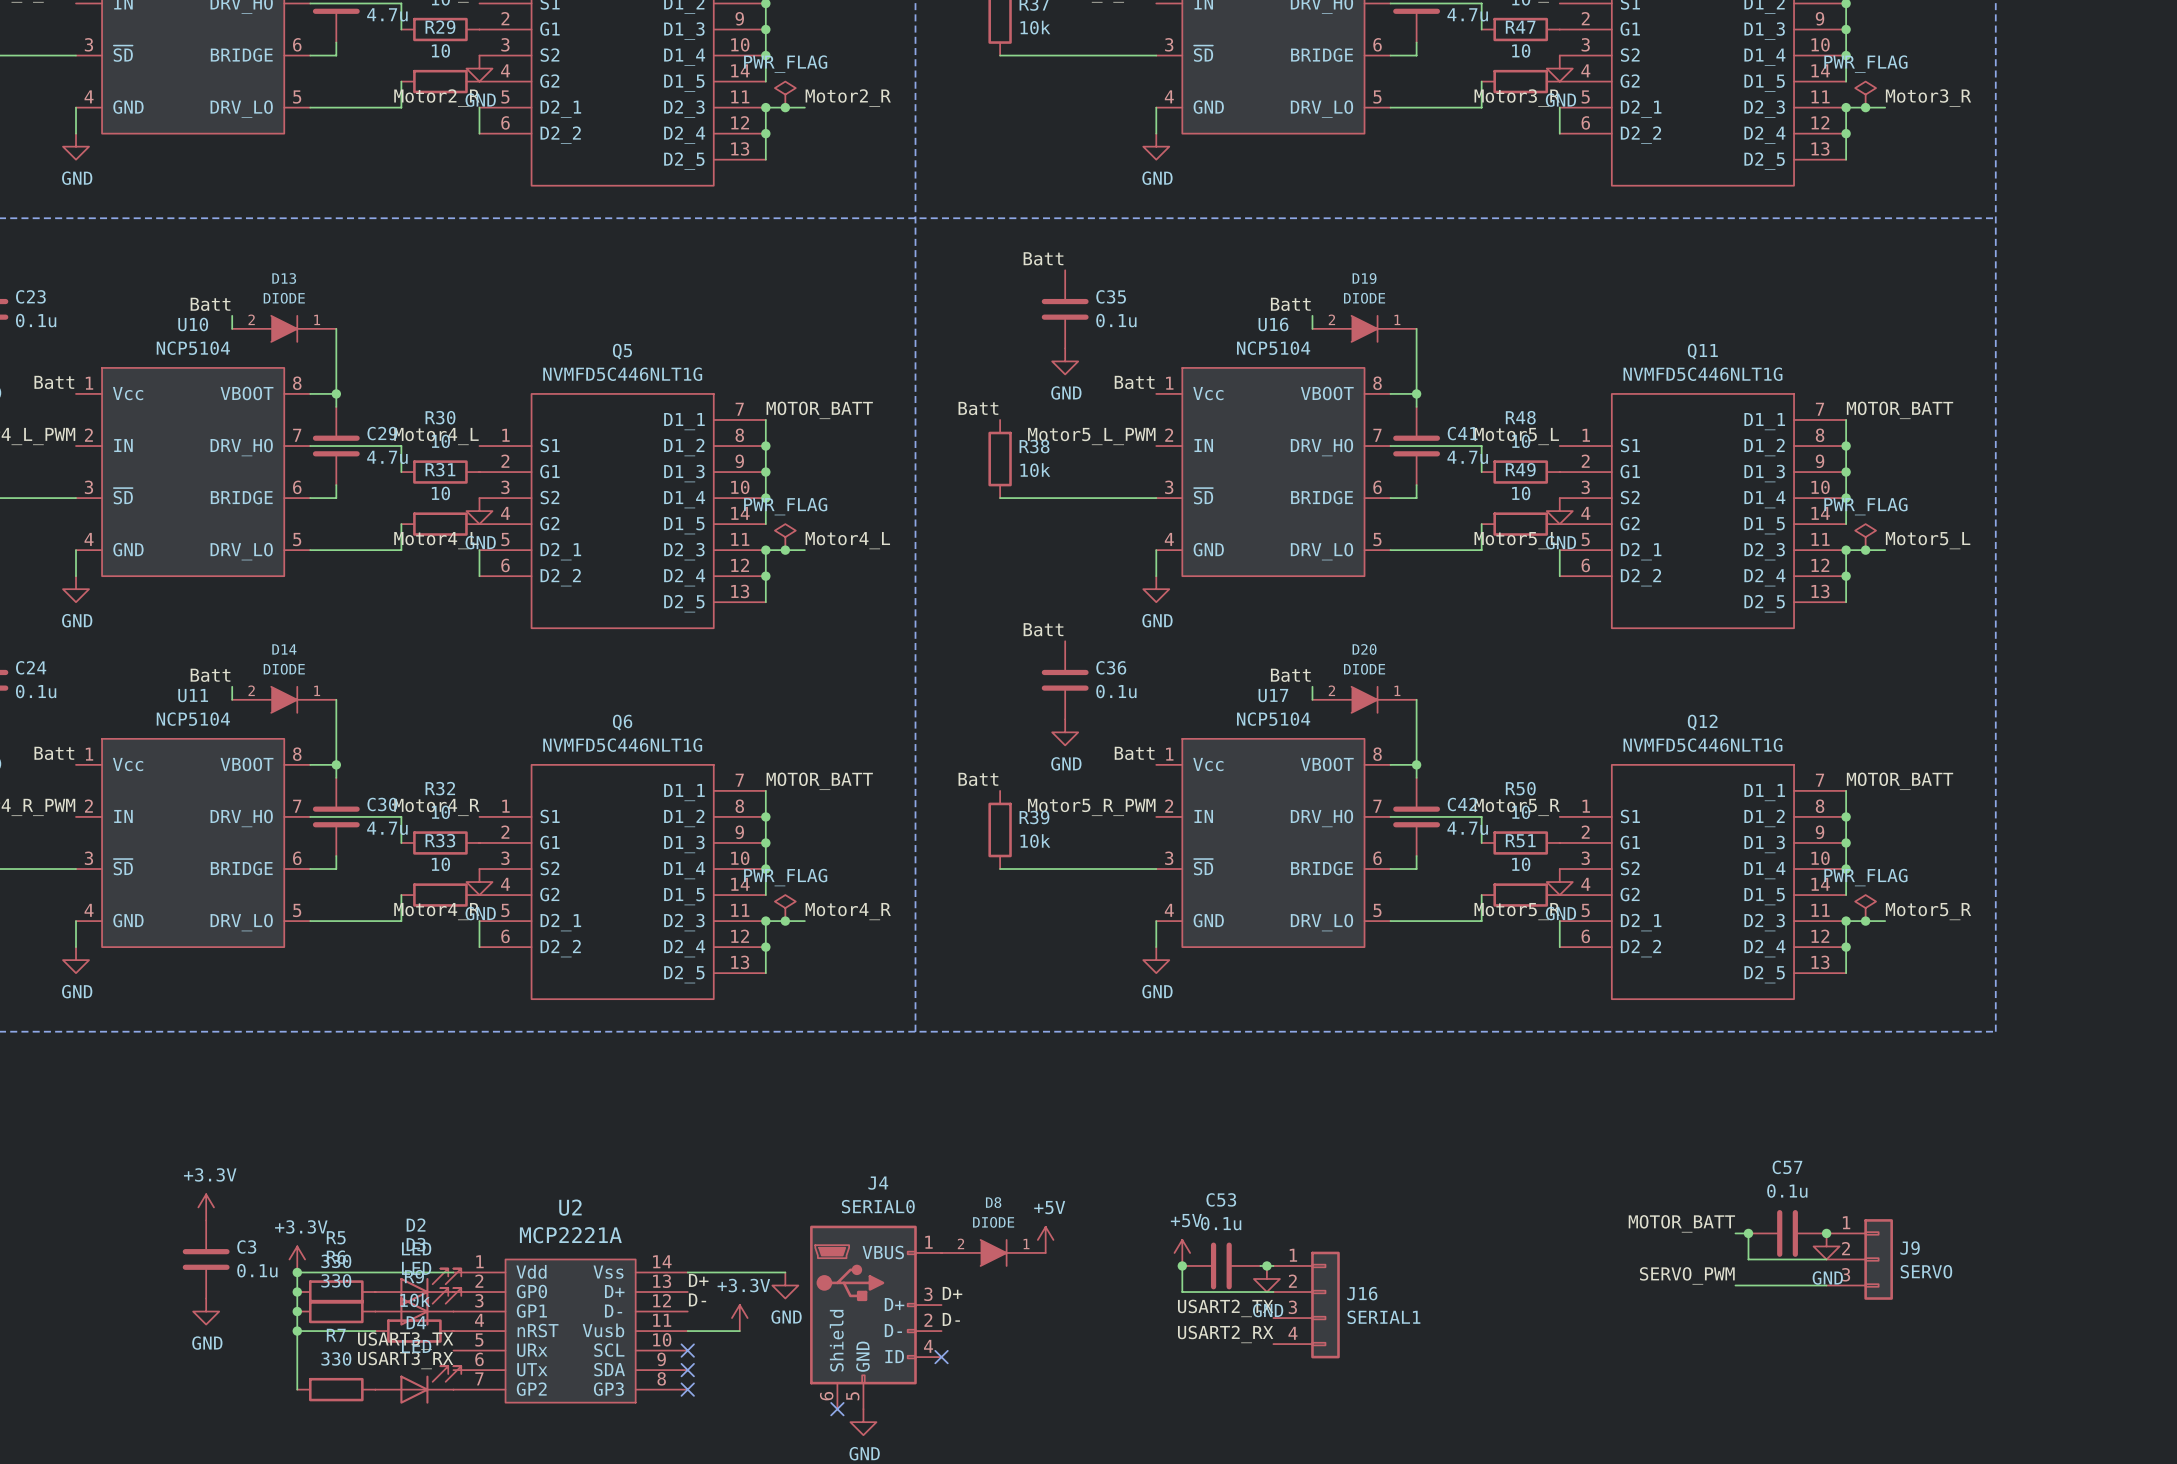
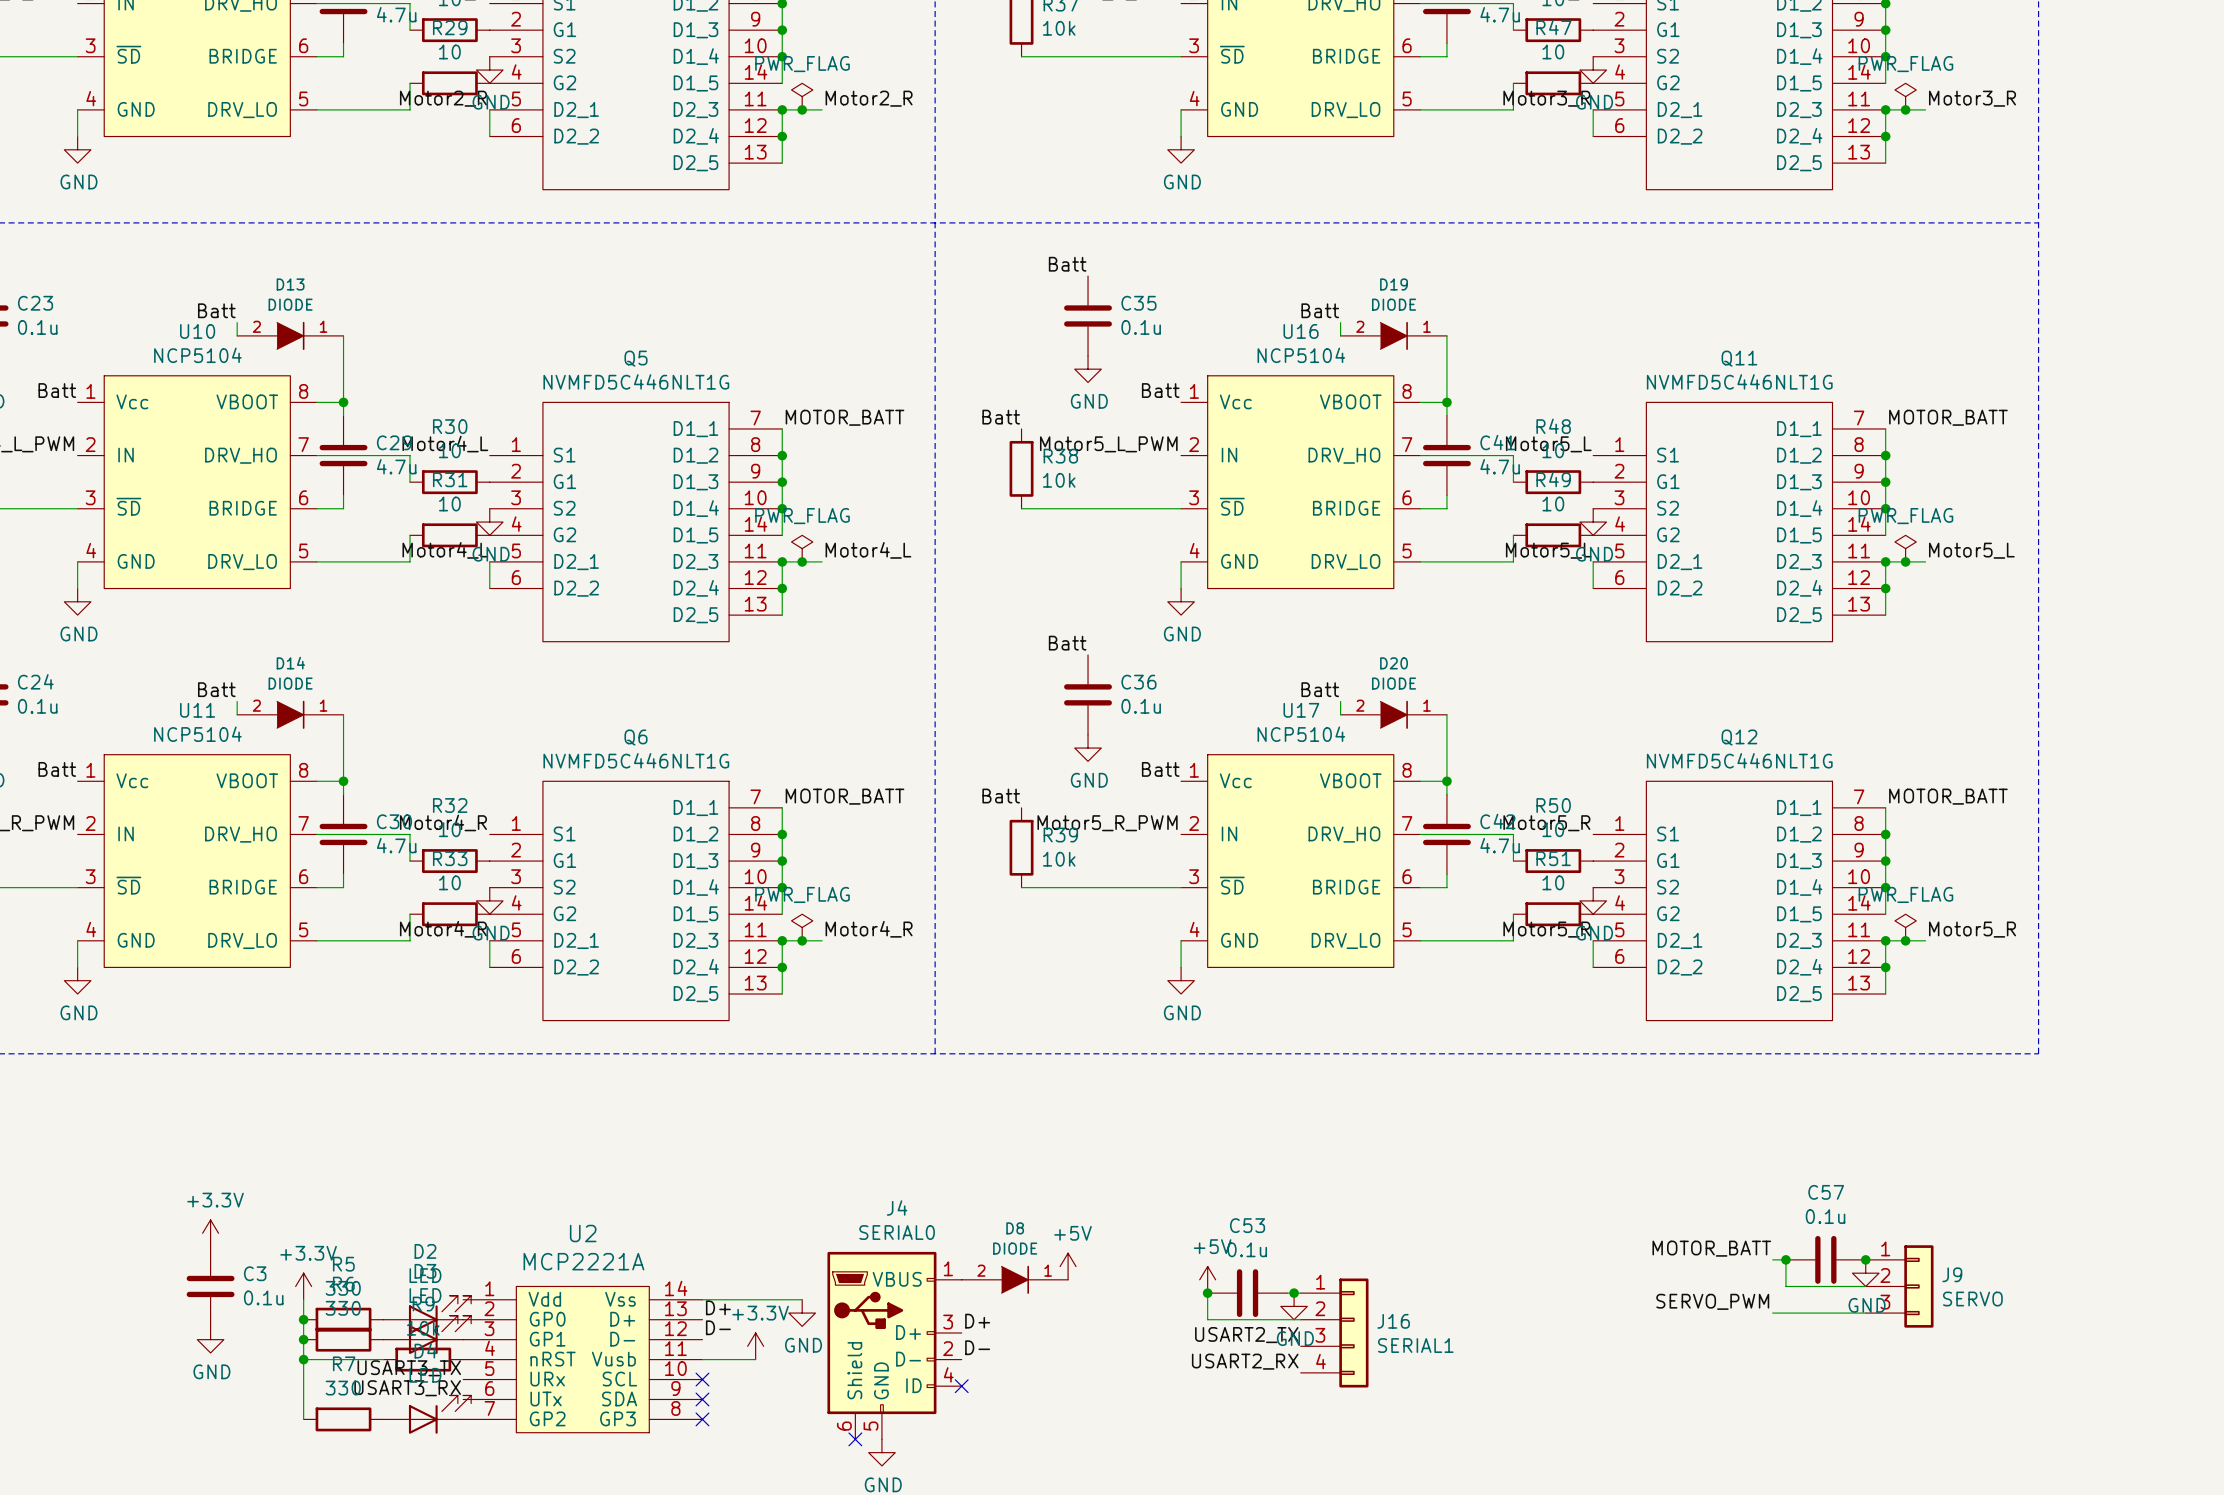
wire: (297, 1272) (453, 1272) -> none
junction: (297, 1272) -> none

